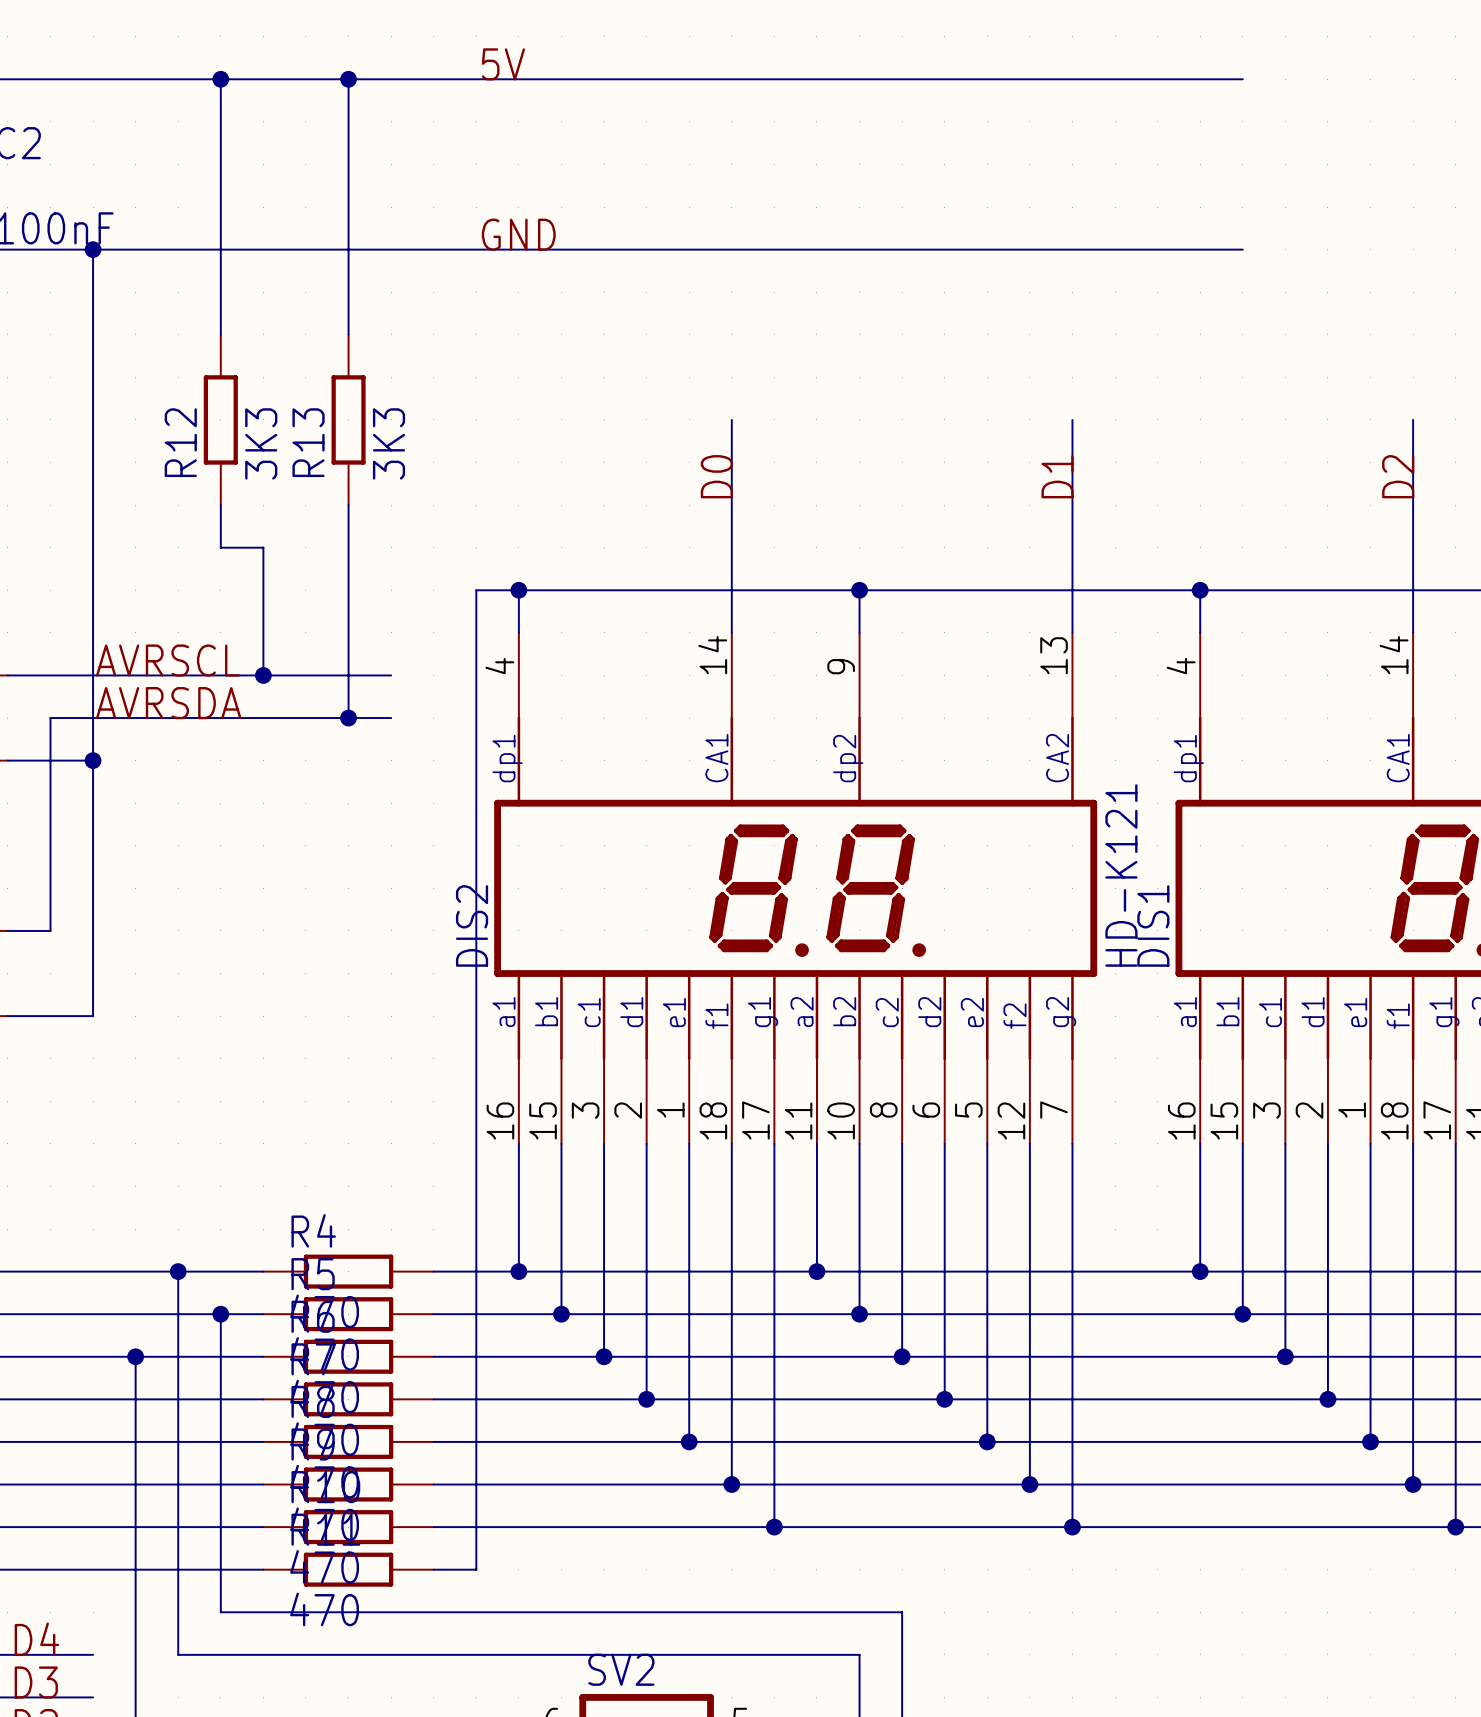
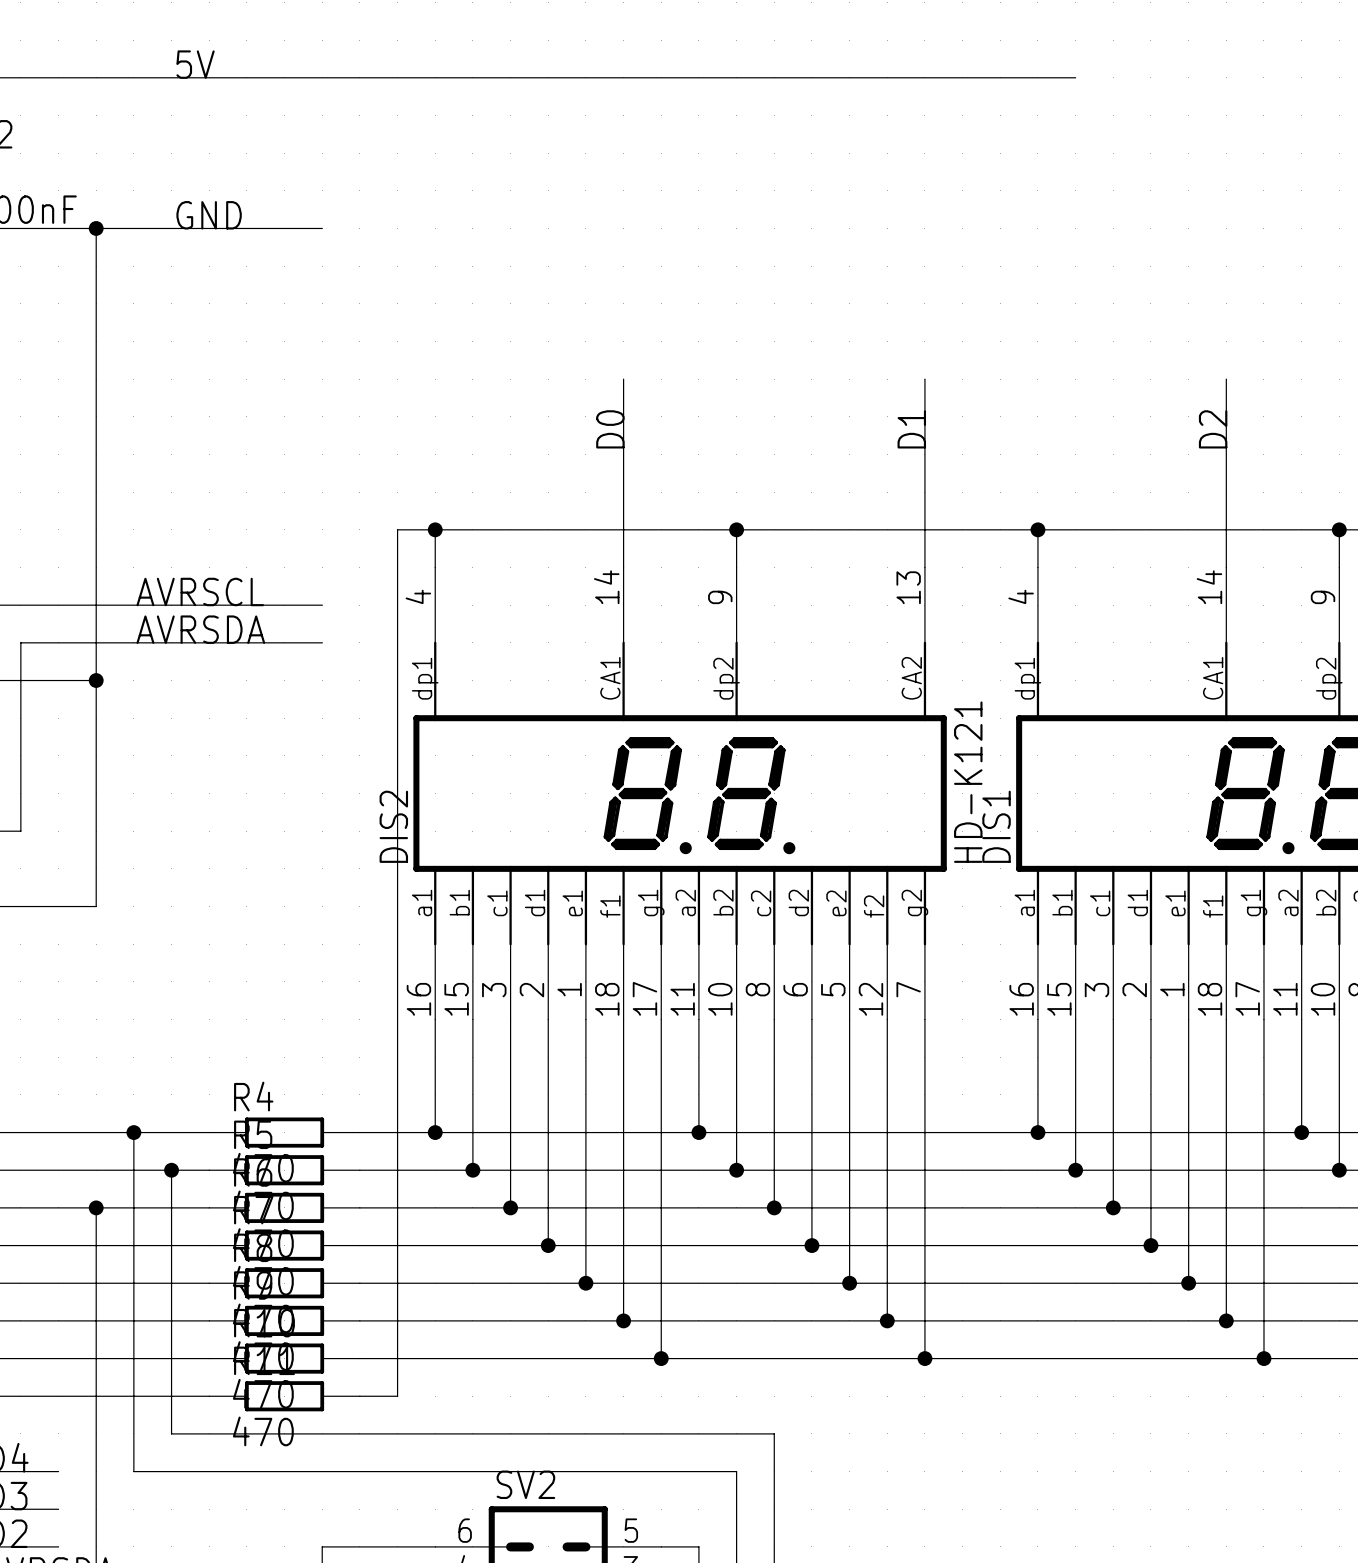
label position: 5V (503, 64) -> 5V (195, 64)
wire: (220, 79) (220, 334) -> none
junction: (220, 79) -> none
wire: (348, 79) (348, 334) -> none
junction: (348, 79) -> none
label position: GND (518, 234) -> GND (209, 215)
wire: (93, 249) (93, 1016) -> (96, 228) (96, 906) (58, 906)
junction position: (93, 249) -> (96, 228)
wire: (391, 249) (1242, 249) -> none
R12: 3K3 (220, 419) -> none
R13: 3K3 (348, 419) -> none
wire: (220, 505) (220, 547) (263, 547) (263, 675) -> none
wire: (348, 505) (348, 718) -> none
label position: AVRSCL (168, 660) -> AVRSCL (200, 591)
junction: (263, 675) -> none
label position: AVRSDA (168, 703) -> AVRSDA (200, 629)
junction: (348, 718) -> none
wire: none -> (58, 680) (96, 680)
junction position: (93, 760) -> (96, 680)

